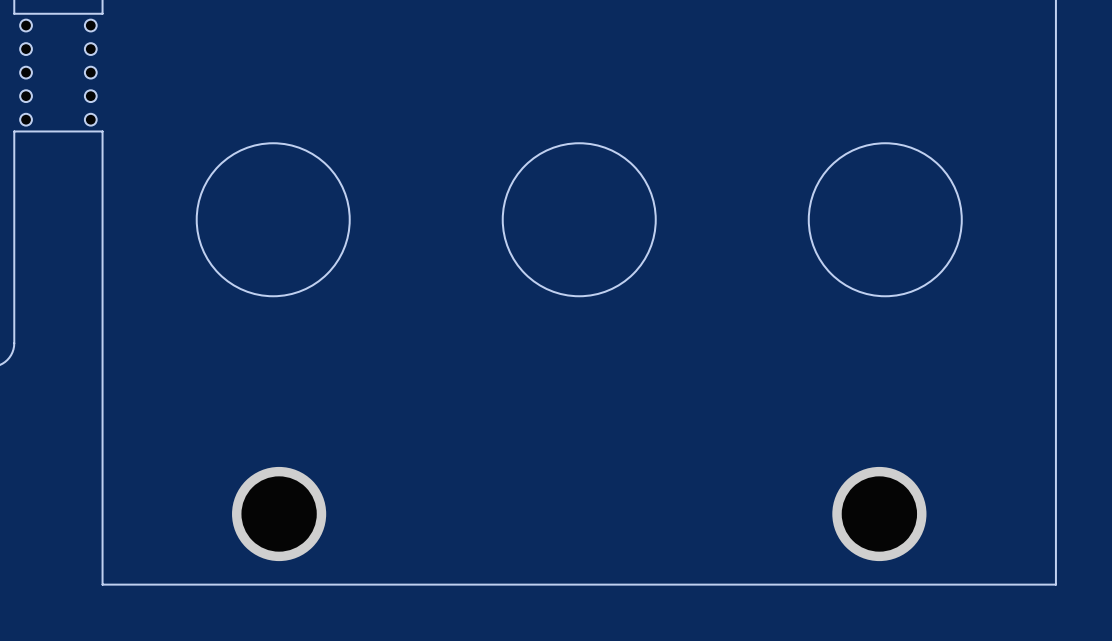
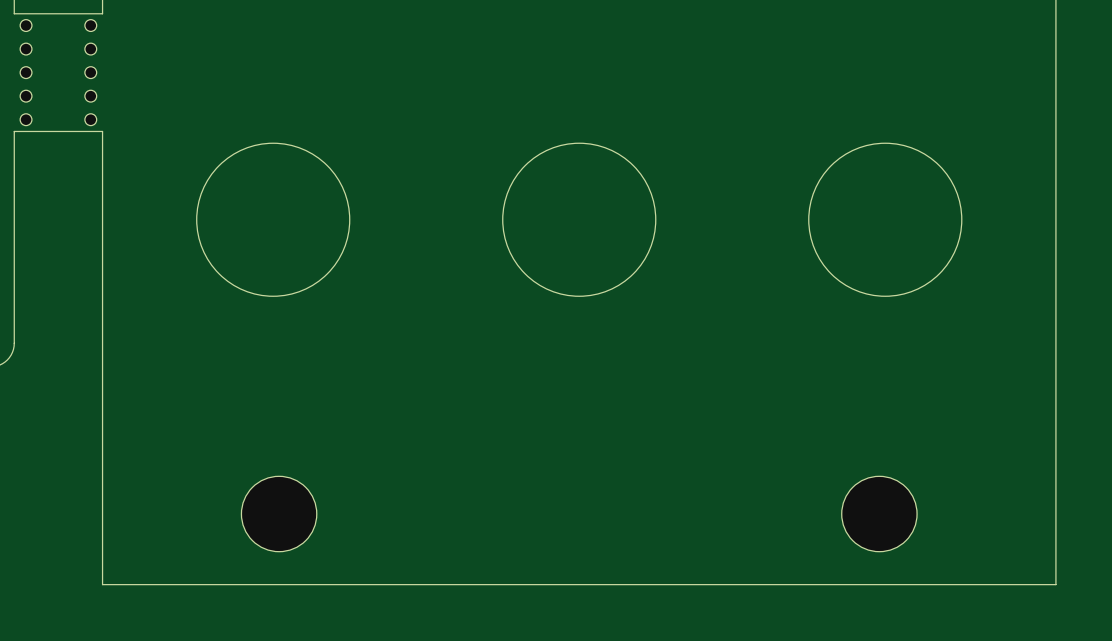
part footprint: [232, 466, 327, 562] -> [241, 476, 317, 552]
part footprint: [832, 466, 927, 562] -> [841, 476, 918, 552]

